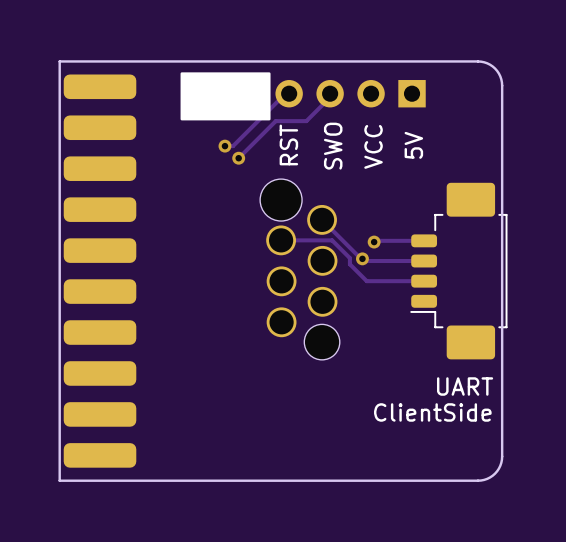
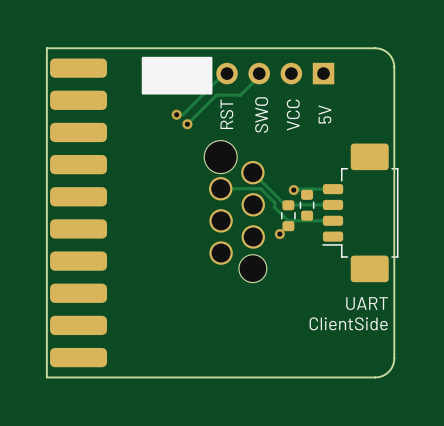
via position: (362, 258) -> (279, 234)
part: none -> (307, 205)
part: none -> (288, 215)

